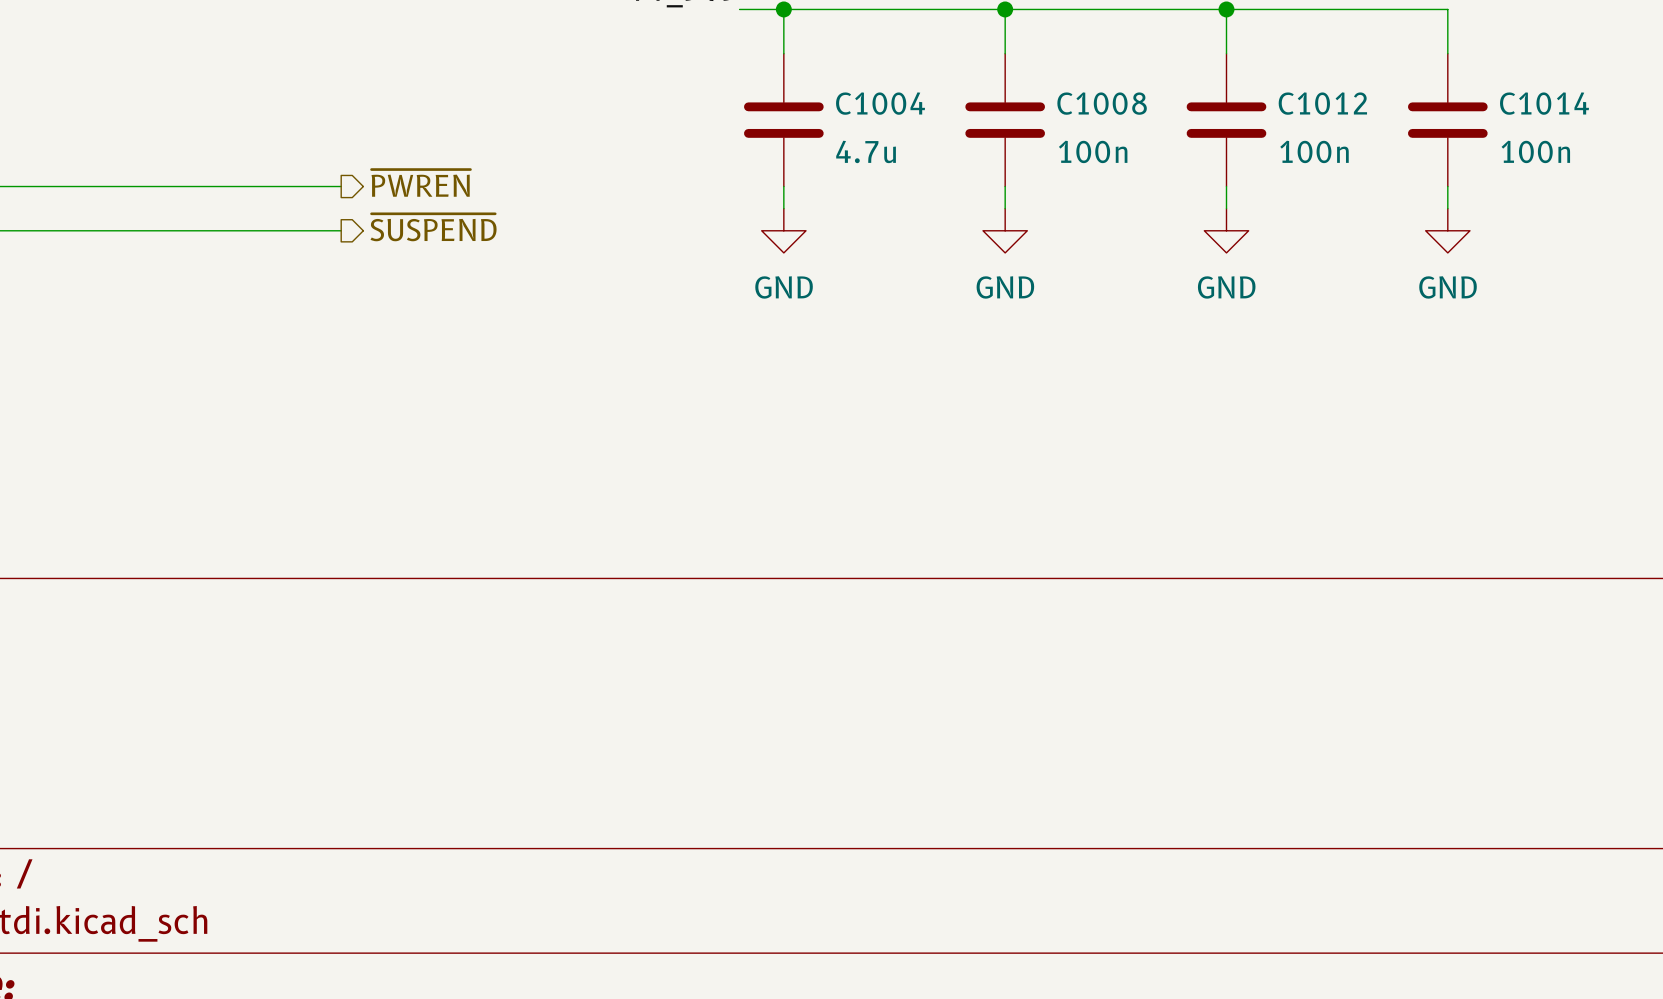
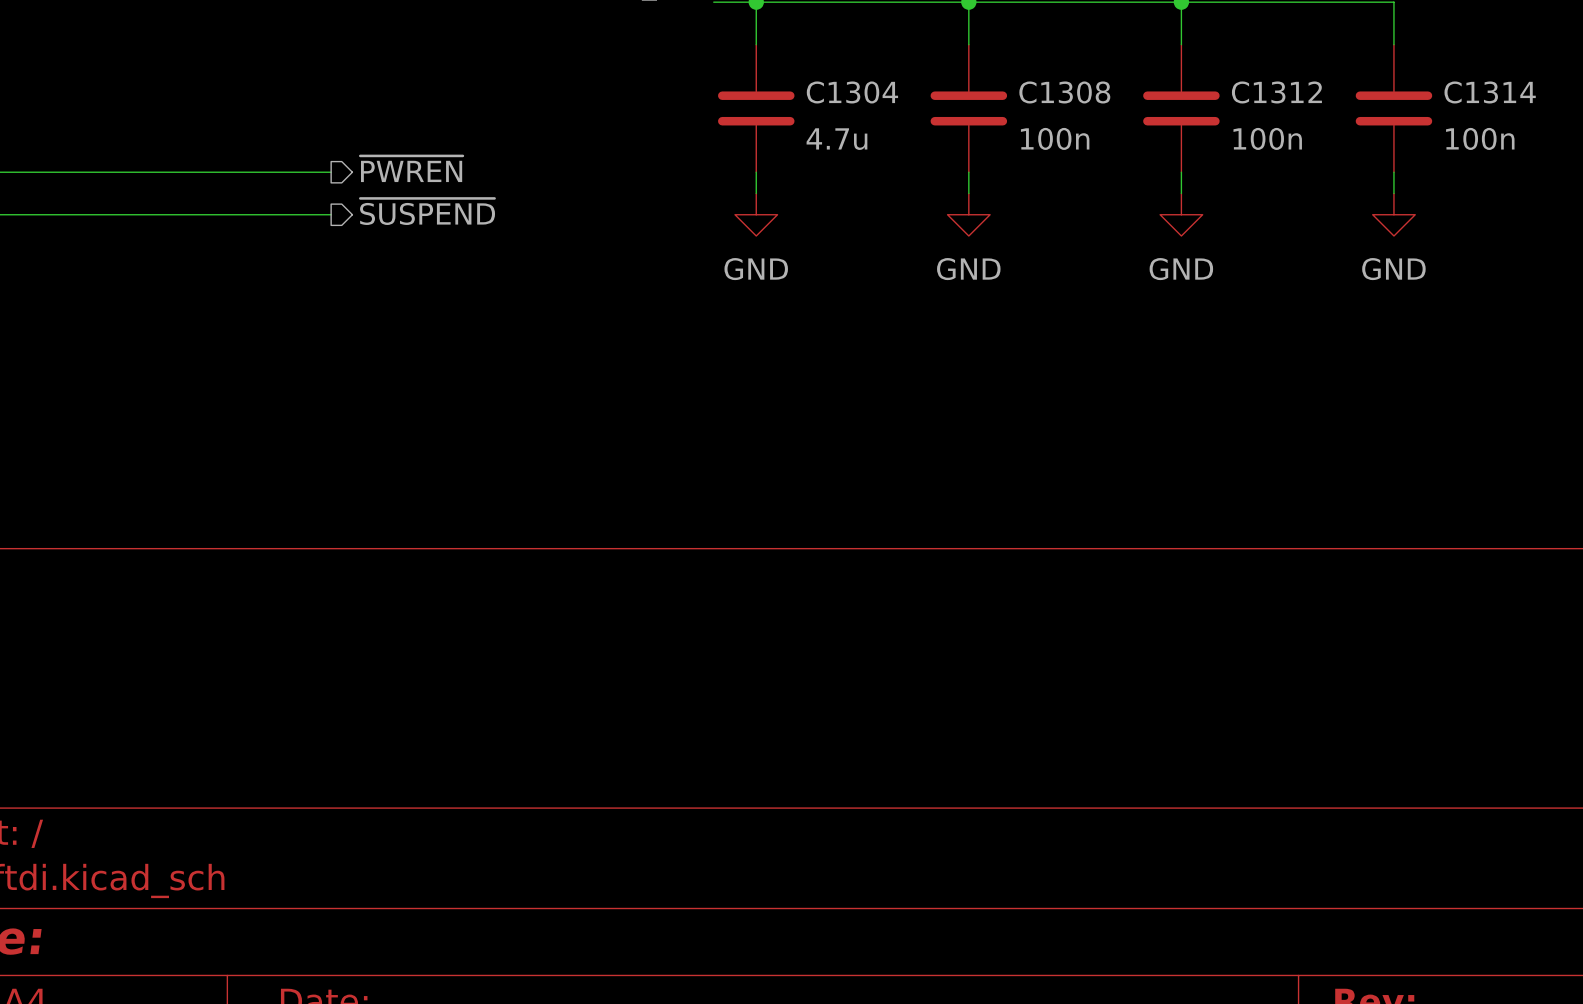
C1004 name: C1004 (880, 103) -> C1304 (852, 92)
C1008 name: C1008 (1102, 103) -> C1308 (1064, 92)
C1012 name: C1012 (1322, 103) -> C1312 (1276, 92)
C1014 name: C1014 (1544, 103) -> C1314 (1490, 92)

